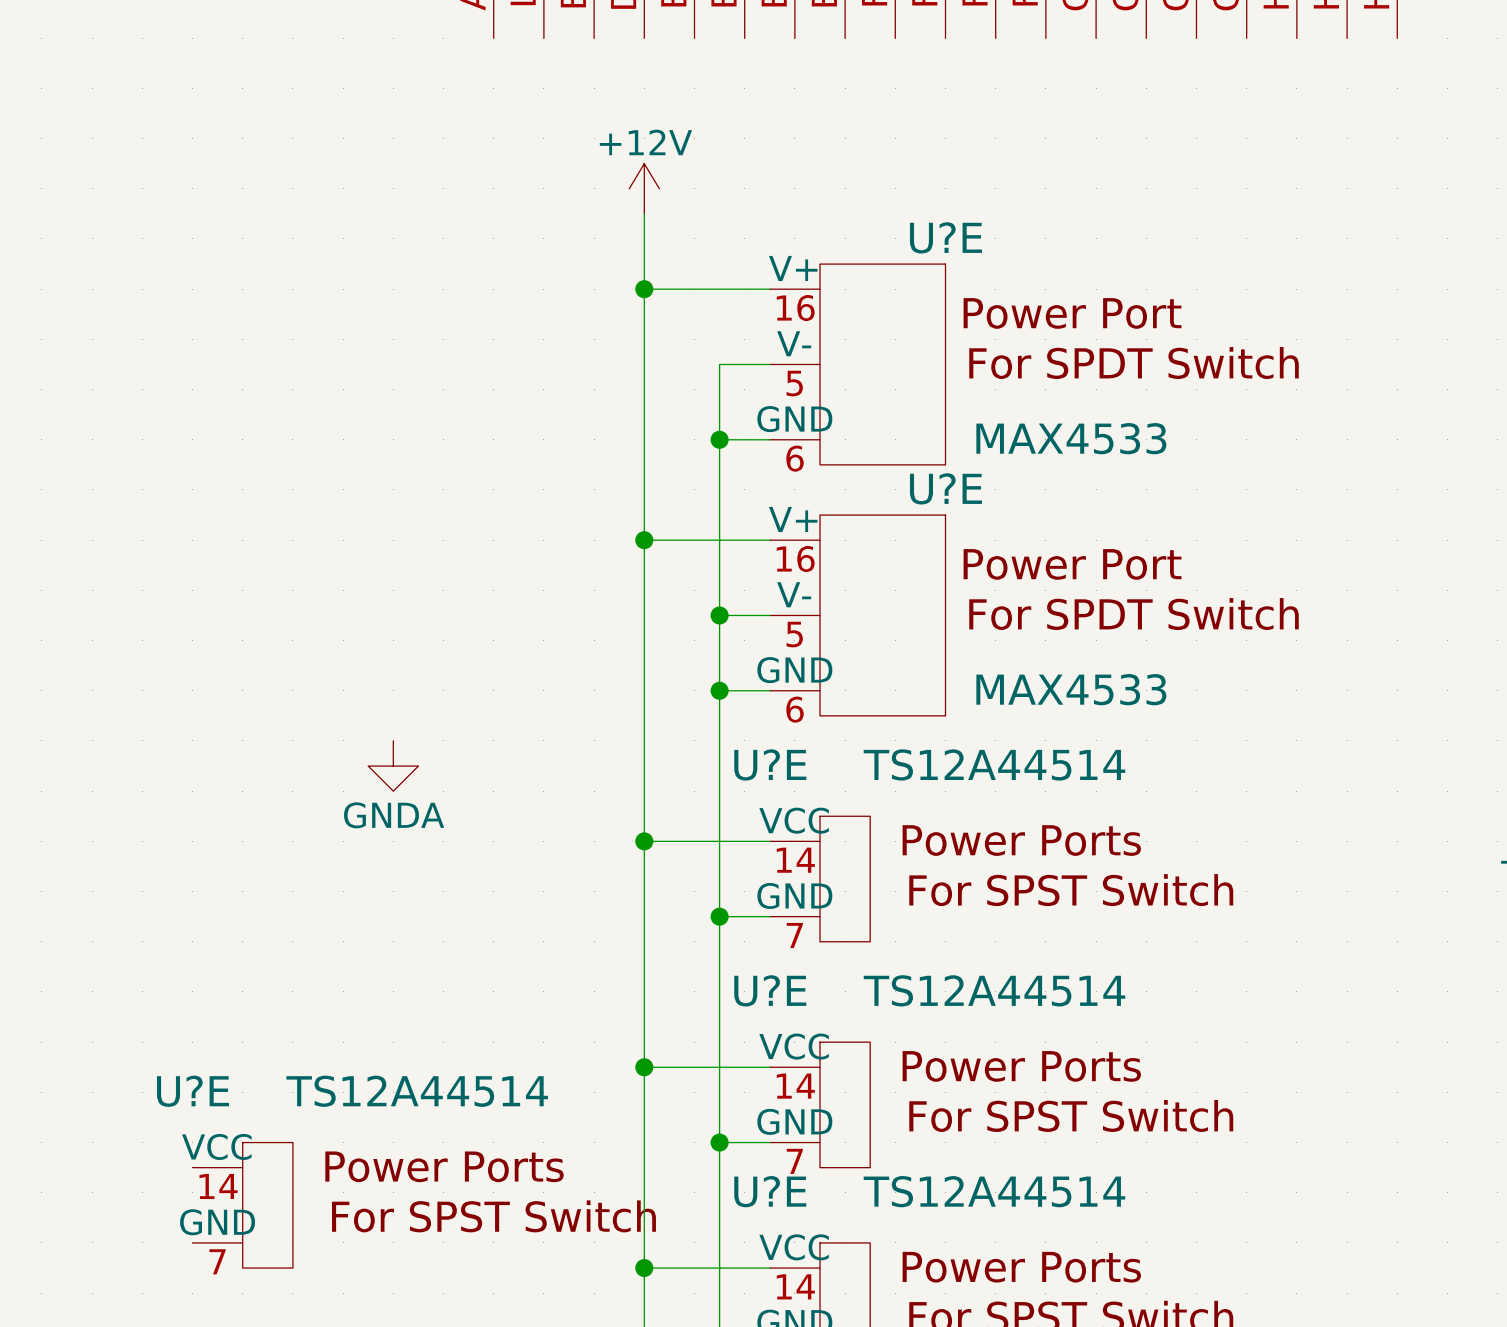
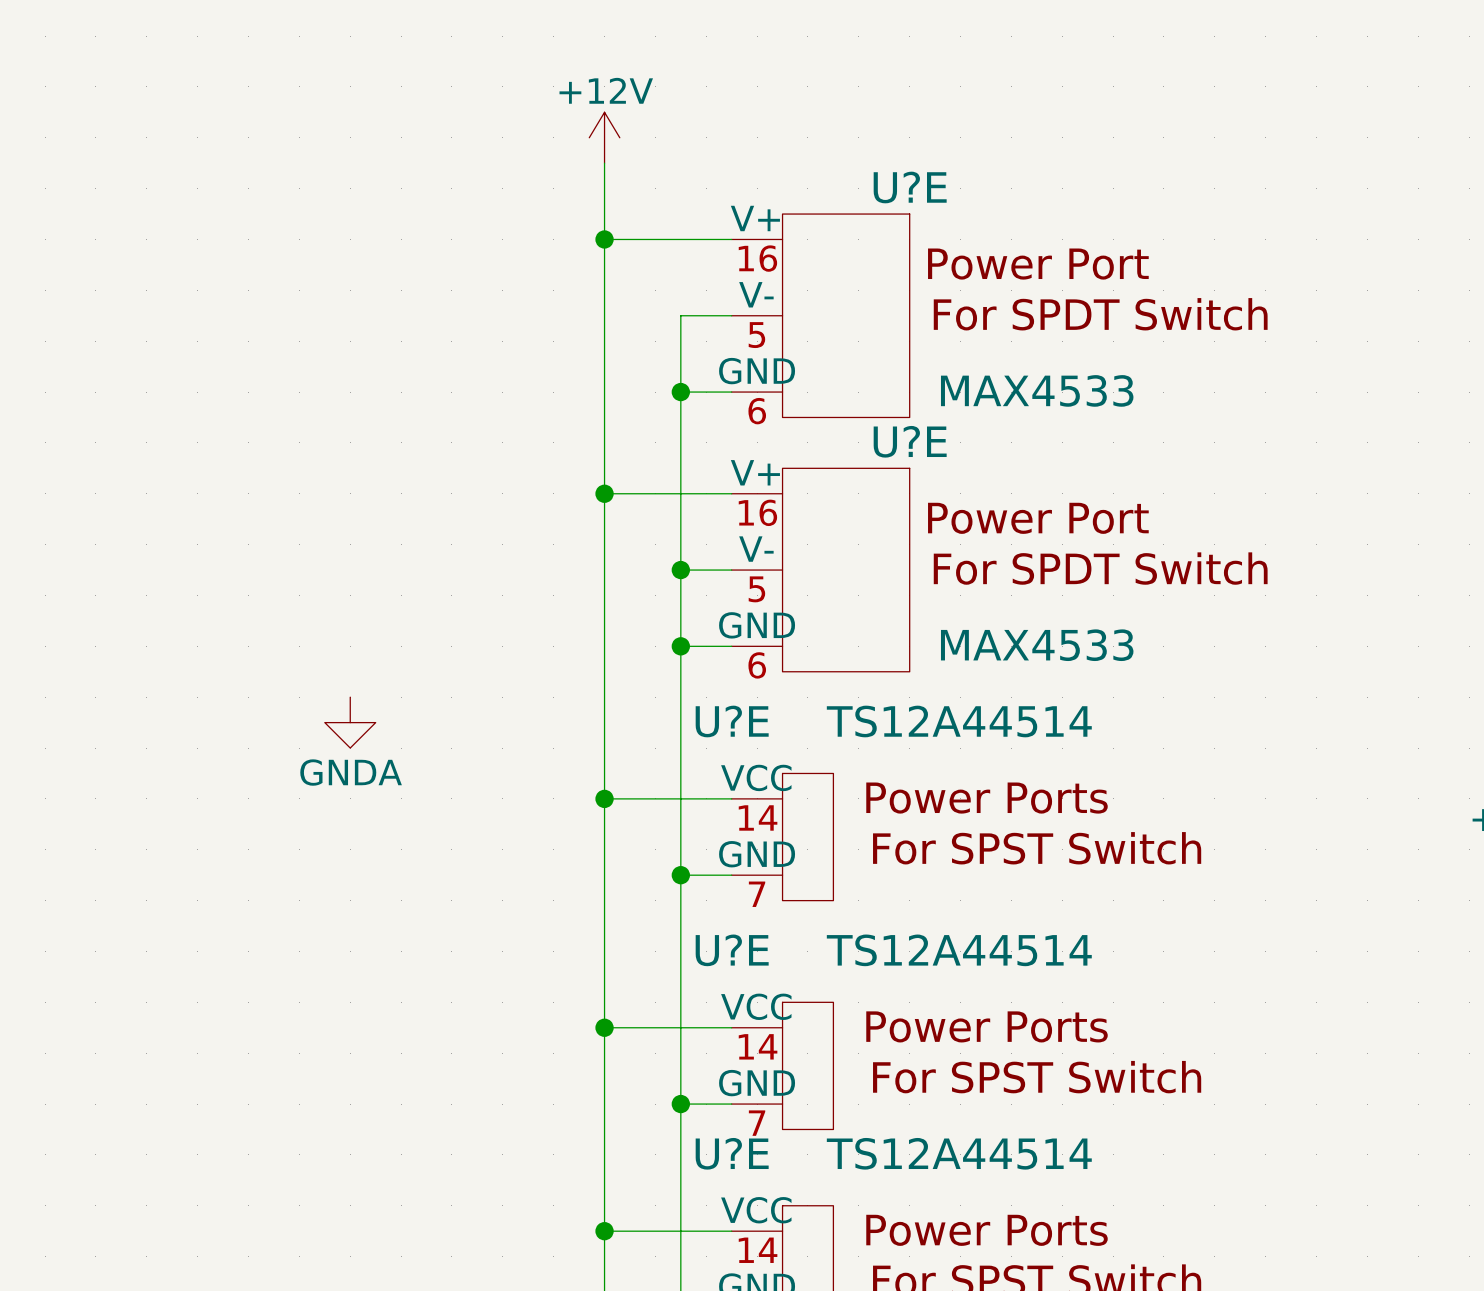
U?E: TS12A44514 (242, 1205) -> none

